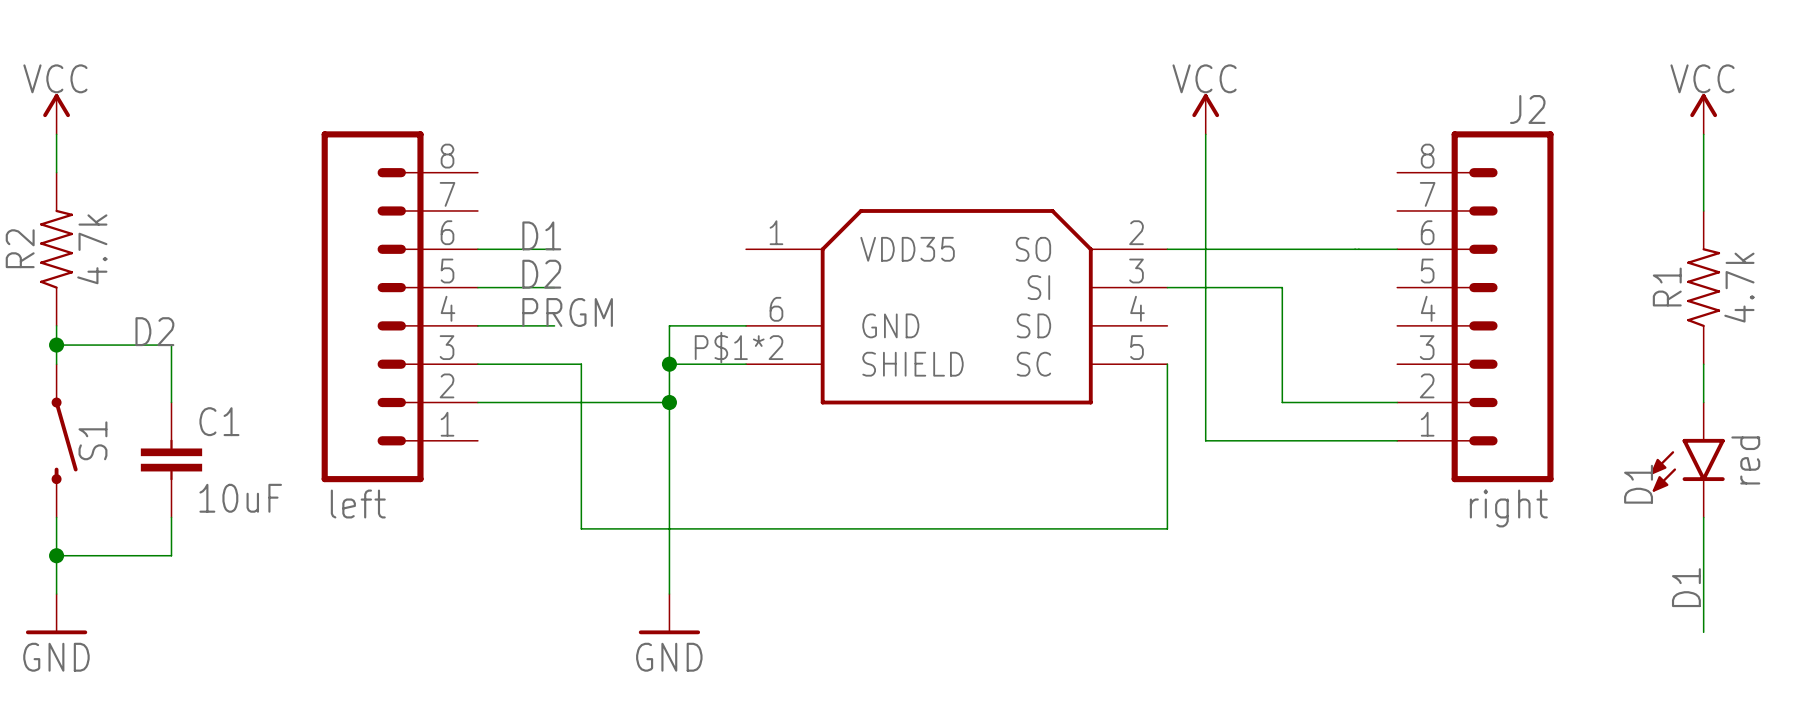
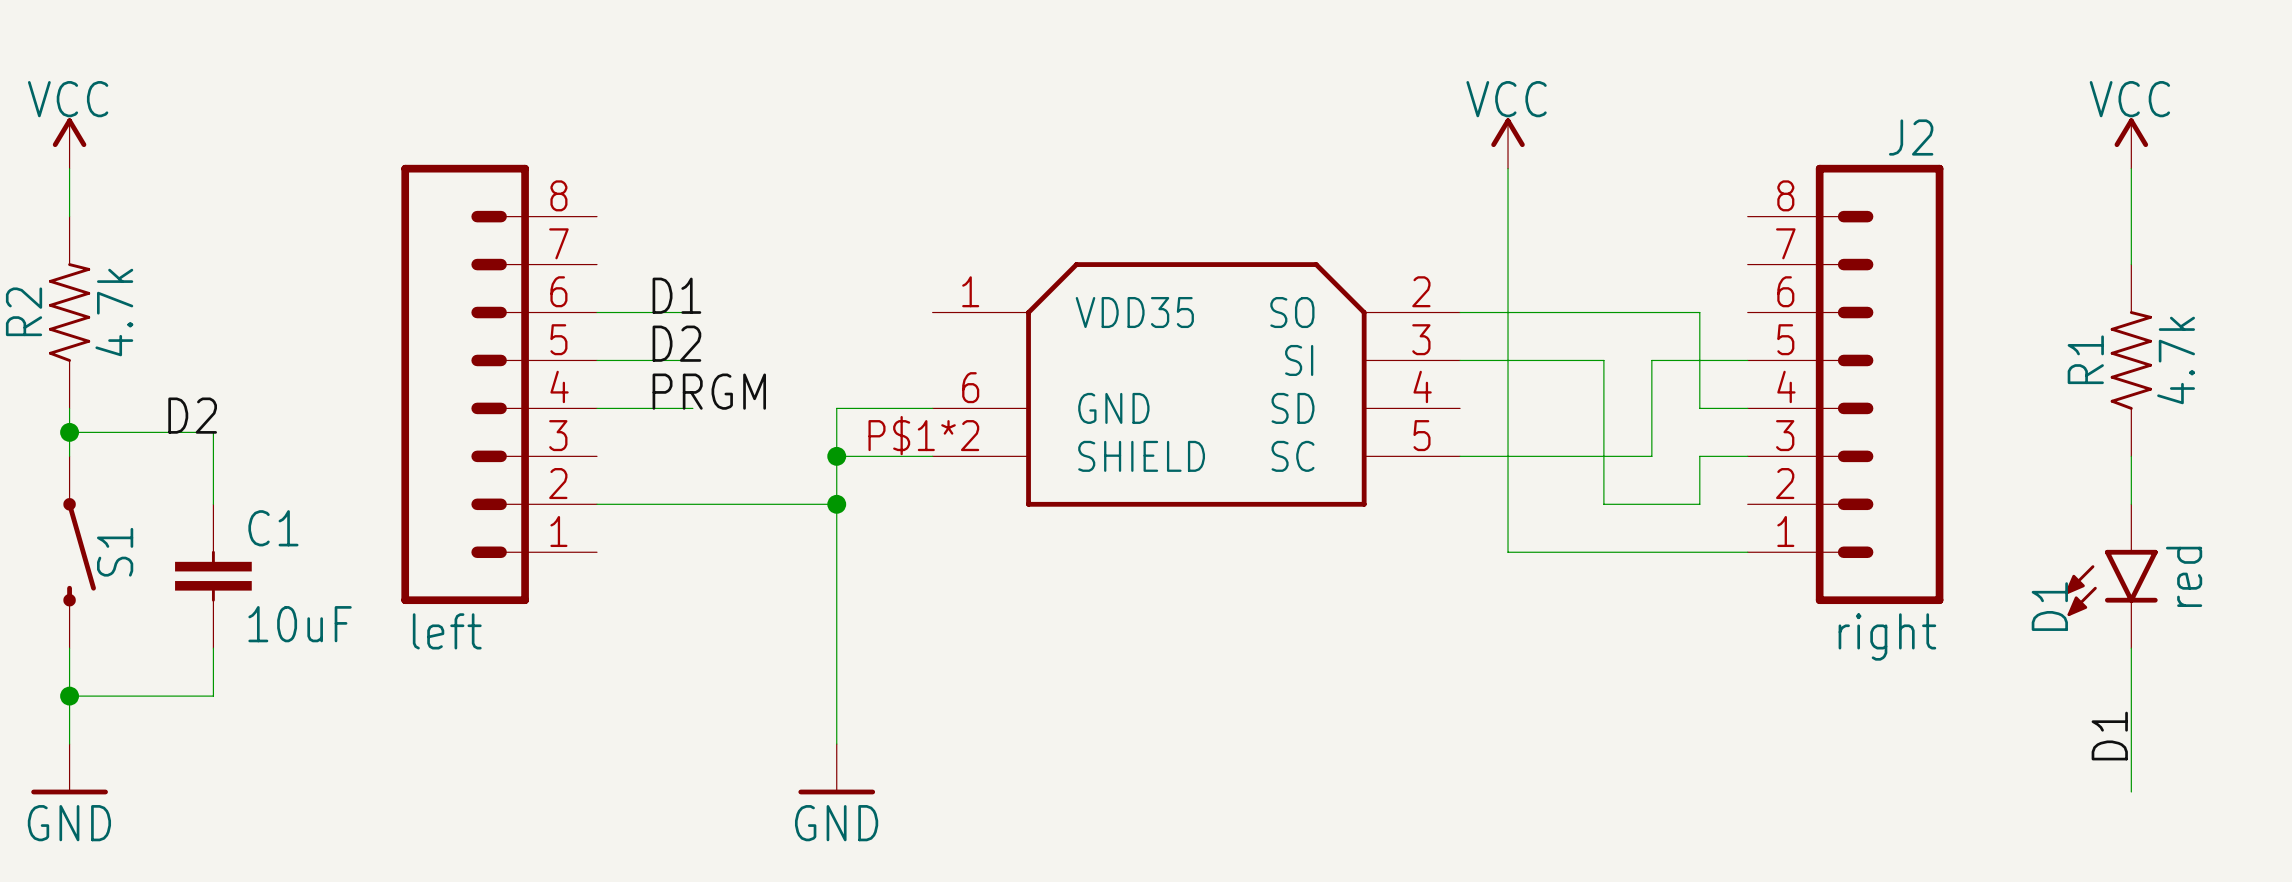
wire: (1358, 249) (1397, 249) -> (1699, 312) (1699, 408) (1747, 408)
wire: (477, 364) (581, 364) (581, 528) (1167, 528) (1167, 364) -> (1747, 360) (1651, 360) (1651, 456) (1460, 456)
wire: (1358, 402) (1397, 402) -> (1699, 504) (1699, 456) (1747, 456)

